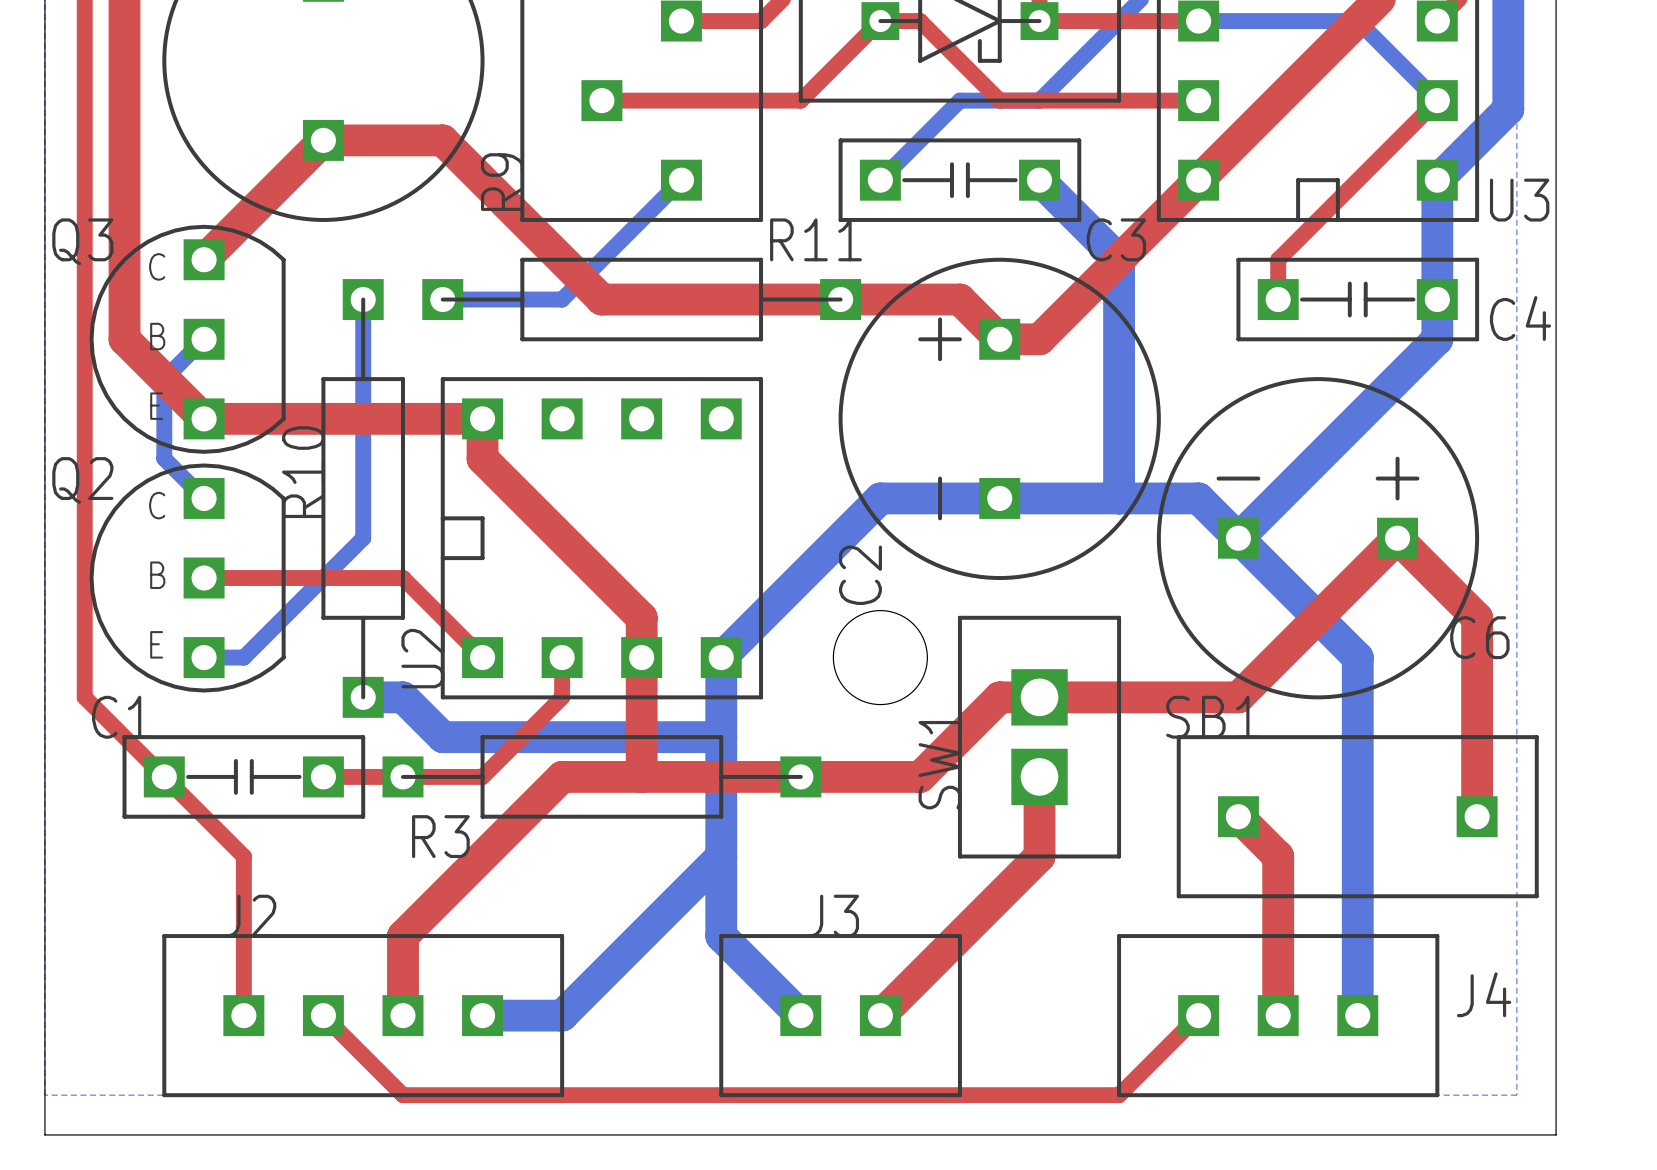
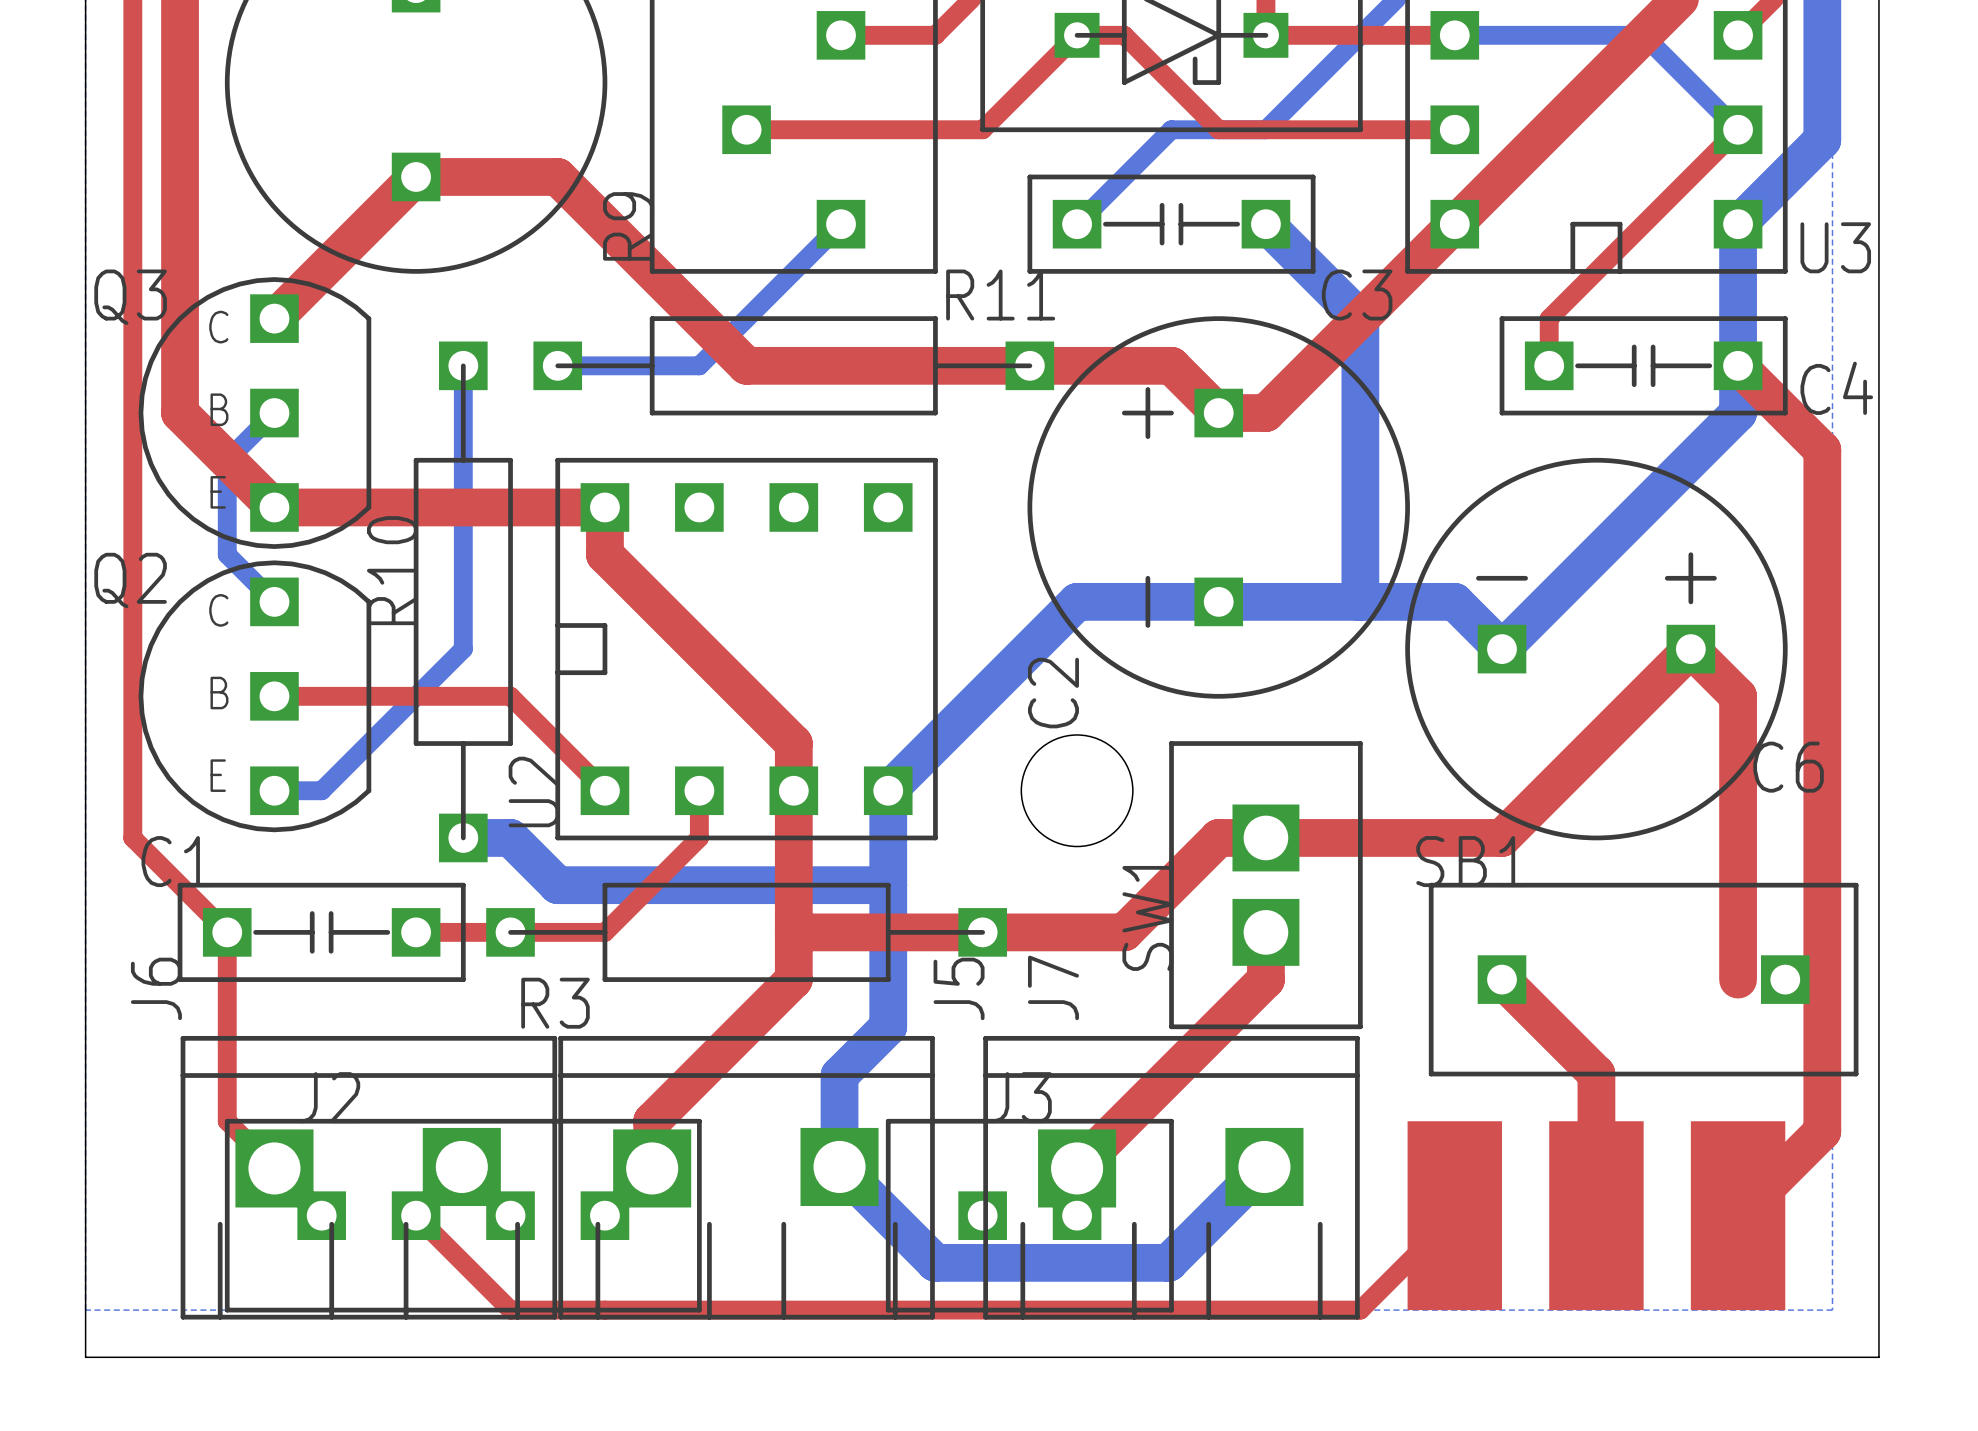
top track: none -> (1738, 365) (1822, 450) (1822, 1131) (1738, 1215)
bottom track: (1238, 538) (1357, 657) (1357, 1015) -> none
top track: (1437, 578) (1477, 617) (1477, 816) -> (1738, 696) (1738, 979)
top track: (164, 776) (243, 856) (243, 1015) -> (227, 932) (227, 1121) (274, 1168)
top track: (641, 776) (562, 776) (402, 936) (402, 1015) -> (793, 932) (793, 979) (652, 1121) (652, 1168)
top track: (1039, 816) (1039, 856) (880, 1015) -> (1265, 979) (1077, 1168)
bottom track: (721, 856) (721, 936) (800, 1015) -> none
top track: (1278, 856) (1278, 1015) -> (1549, 1026) (1596, 1074) (1596, 1215) (1594, 1213)
bottom track: (680, 897) (562, 1015) (482, 1015) -> (839, 1075) (839, 1166) (935, 1262) (1168, 1262) (1264, 1166)
J6: none -> (368, 1177)
J5: none -> (746, 1177)
J7: none -> (1171, 1177)
part: none -> (1454, 1215)
J4: (1278, 1015) -> none
part: none -> (1596, 1215)
part: none -> (1738, 1215)

